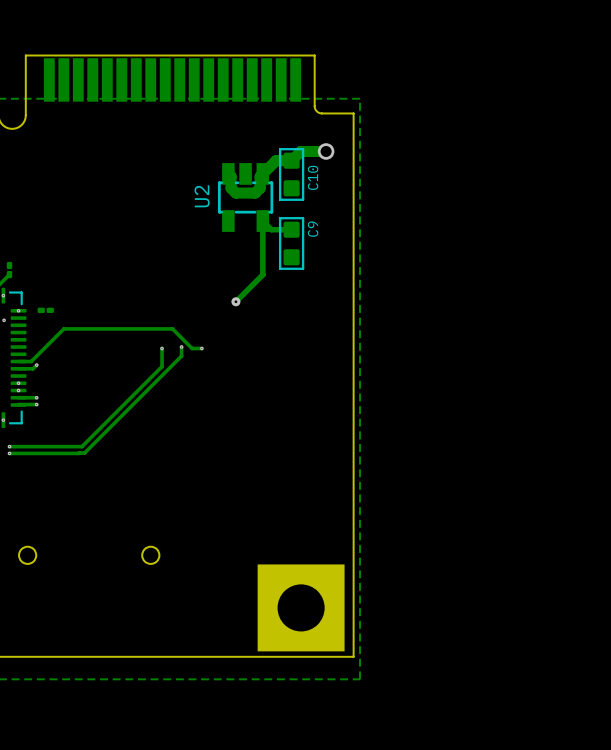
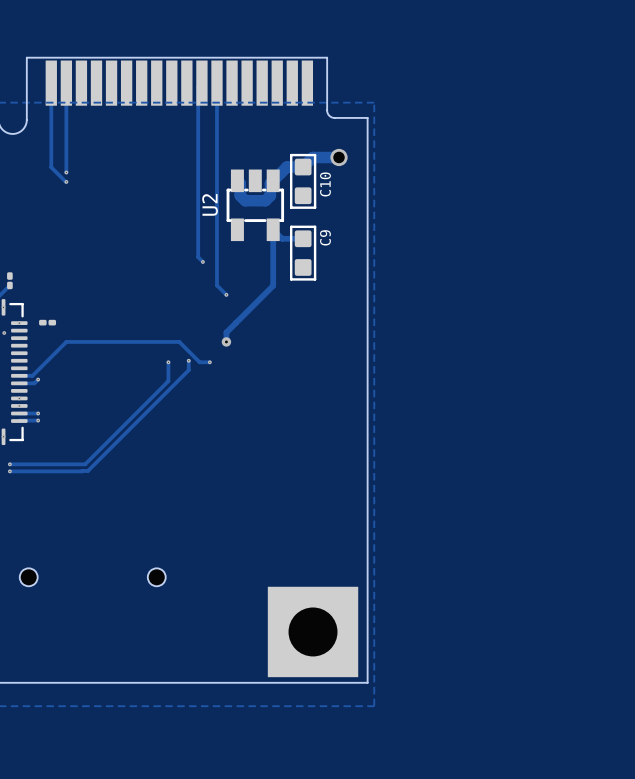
track: none -> (51, 83) (51, 167) (66, 181)
track: none -> (66, 83) (66, 172)
track: none -> (201, 83) (198, 86) (198, 257) (202, 261)
track: none -> (216, 83) (216, 285) (226, 294)
via: none -> (66, 172)
via: none -> (66, 181)
via: none -> (202, 261)
via: none -> (226, 294)
track: none -> (245, 313) (226, 332) (226, 341)
via position: (235, 301) -> (226, 341)

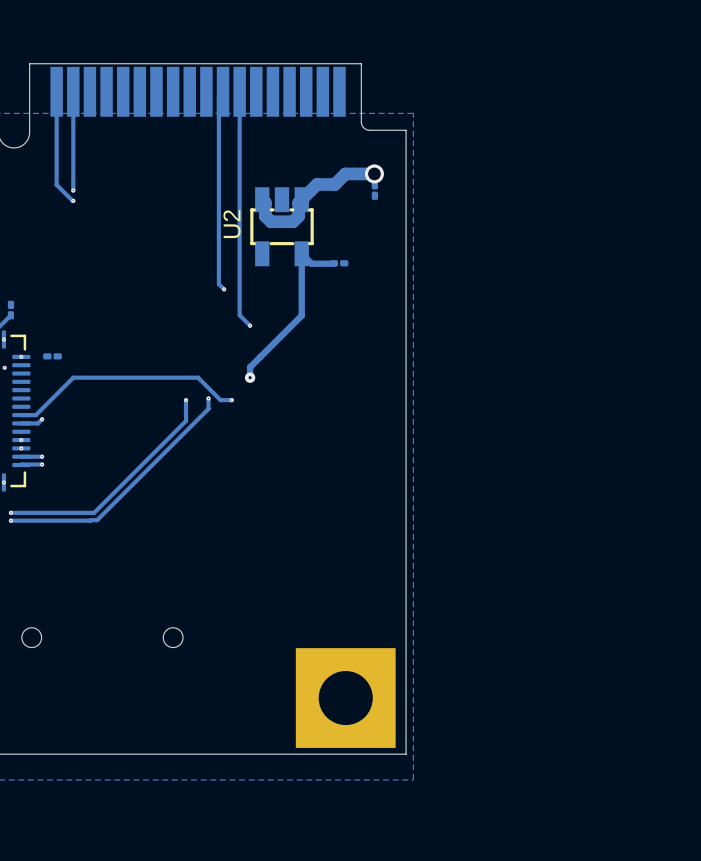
part: none -> (374, 190)
C10: (303, 181) -> none
part: none -> (339, 263)
C9: (303, 253) -> none

